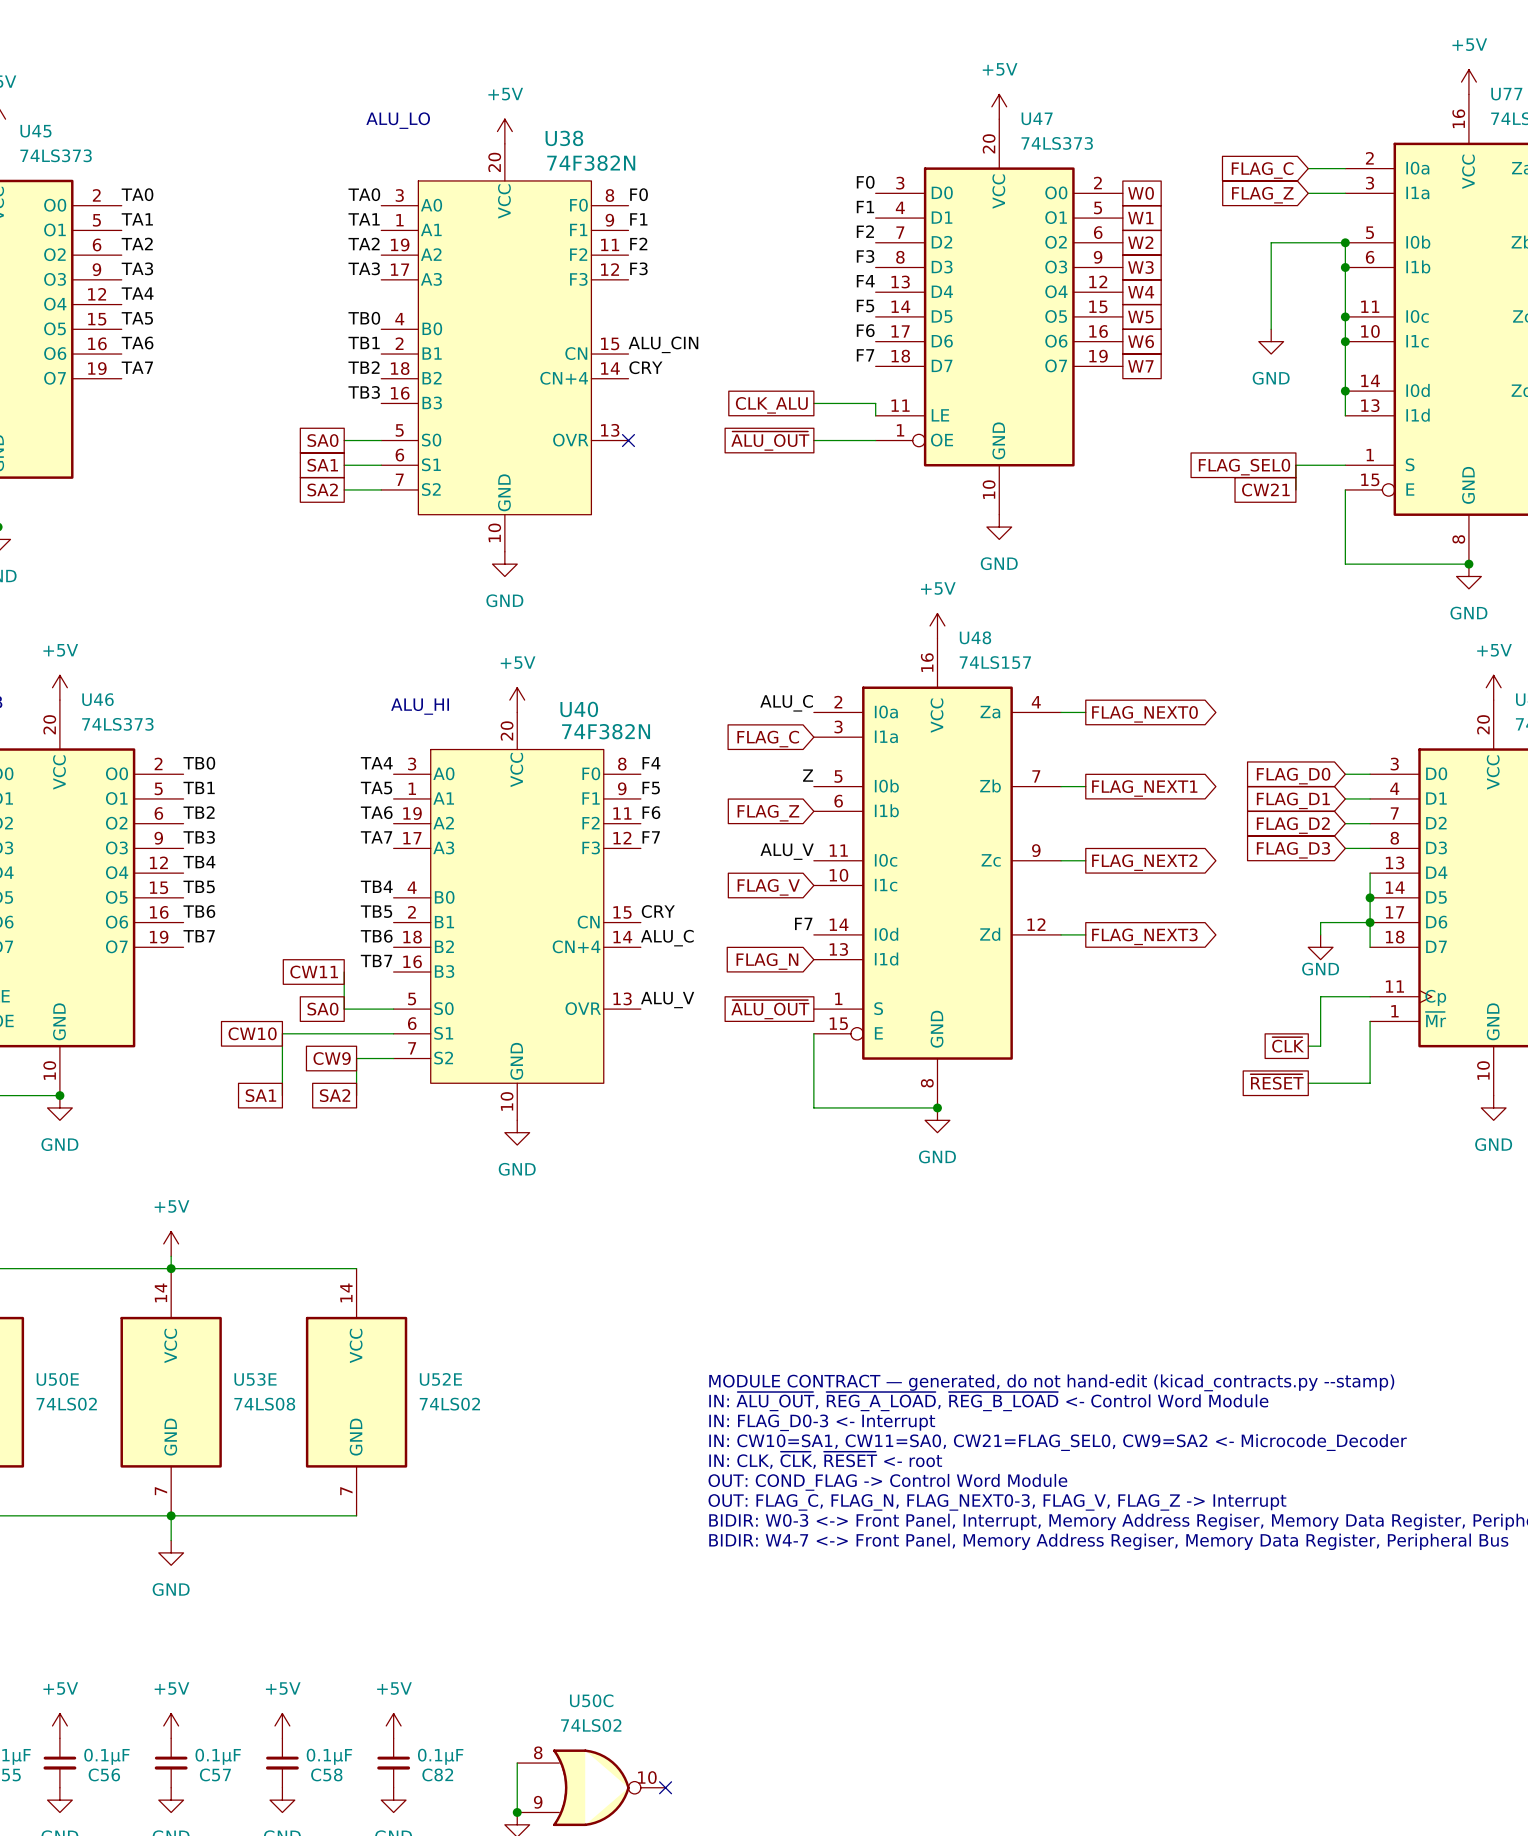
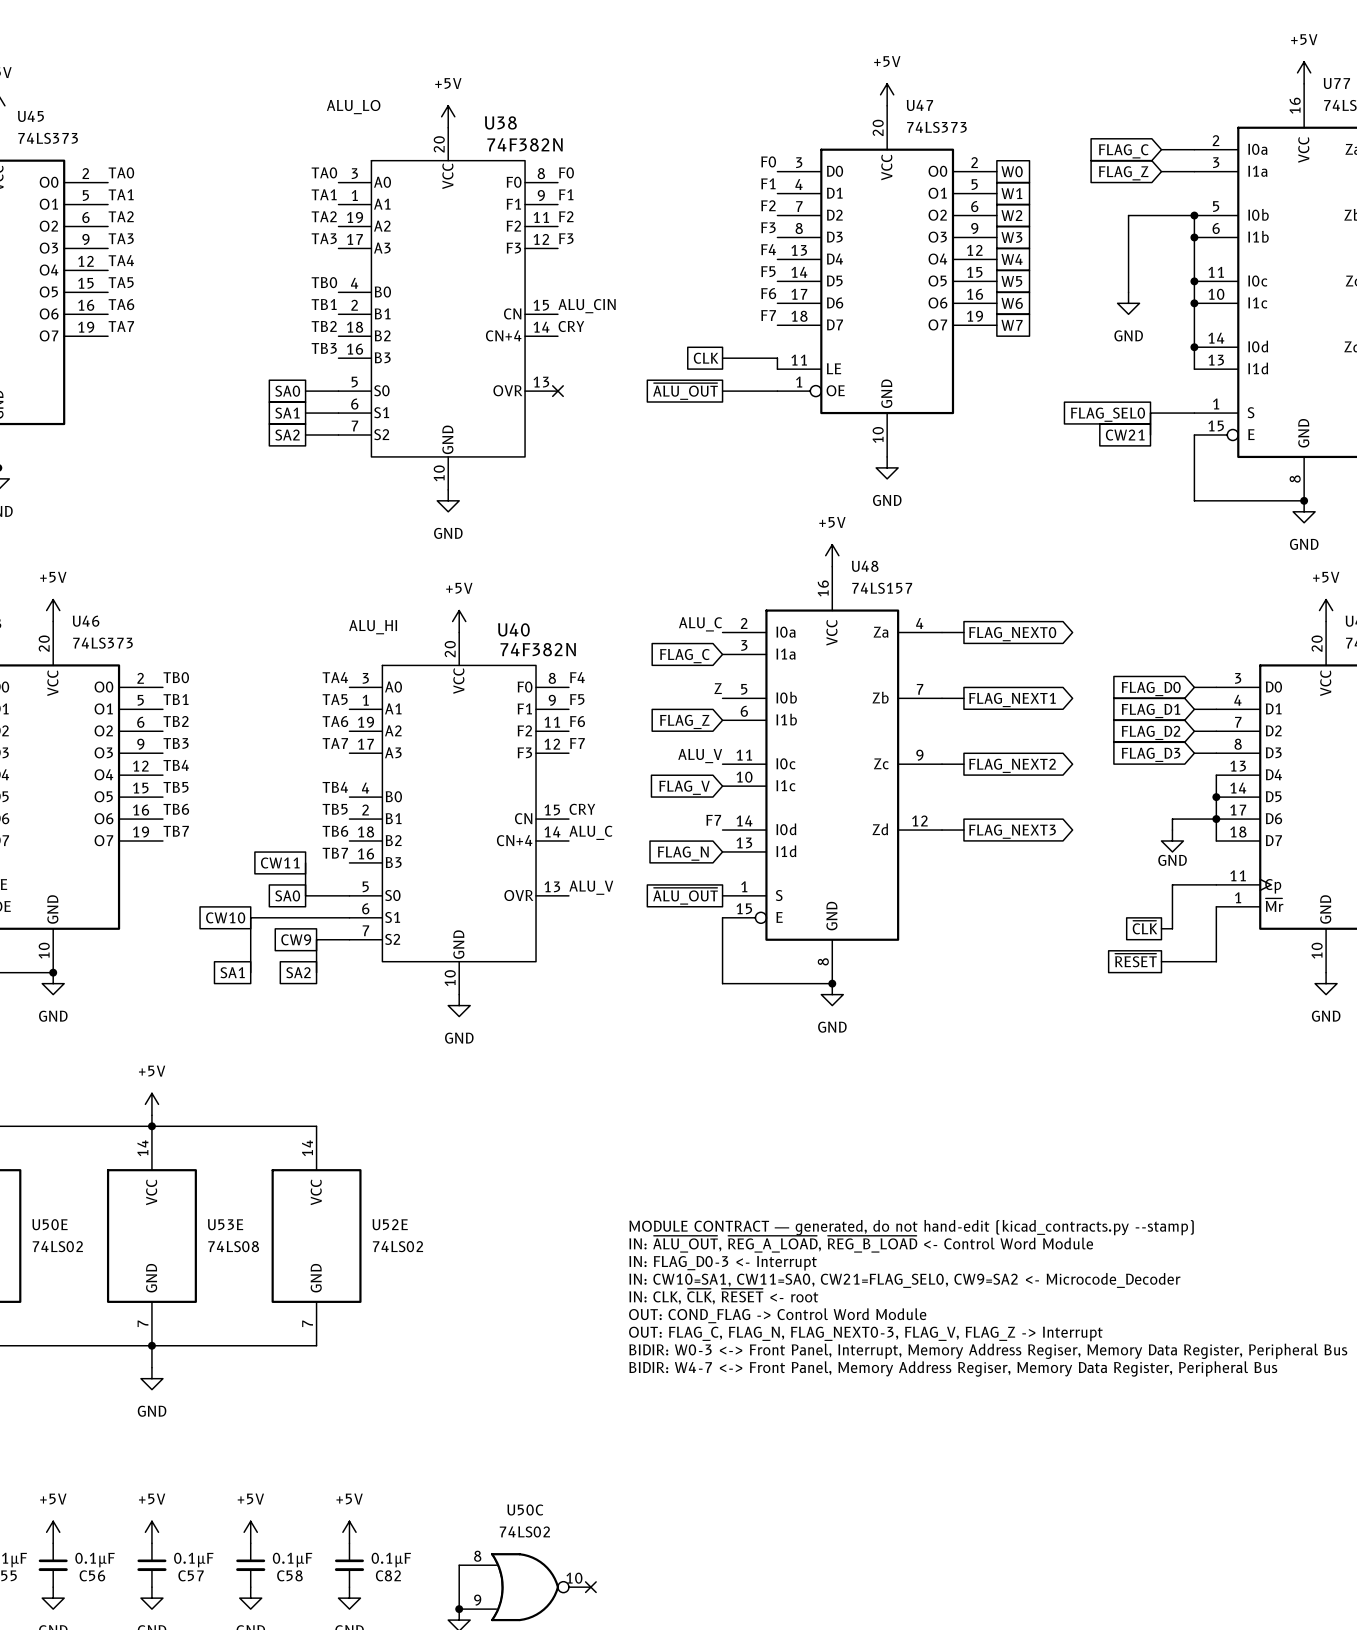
global label: CLK_ALU (771, 405) -> CLK (706, 358)

